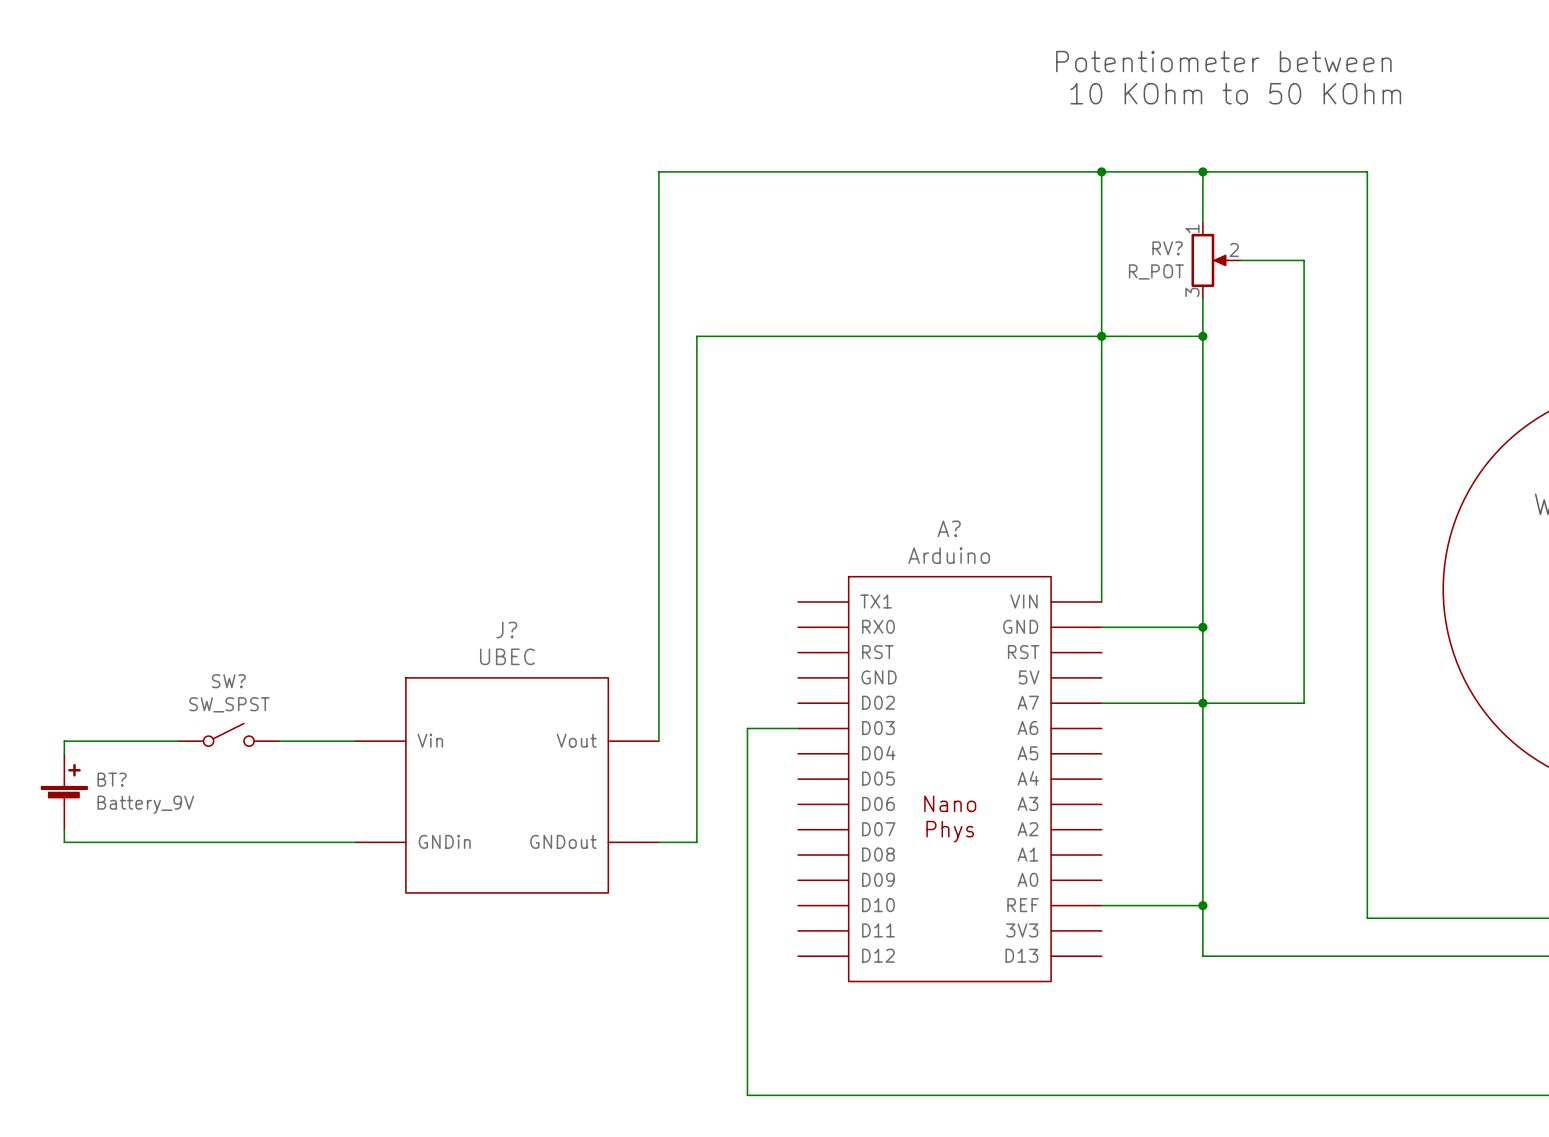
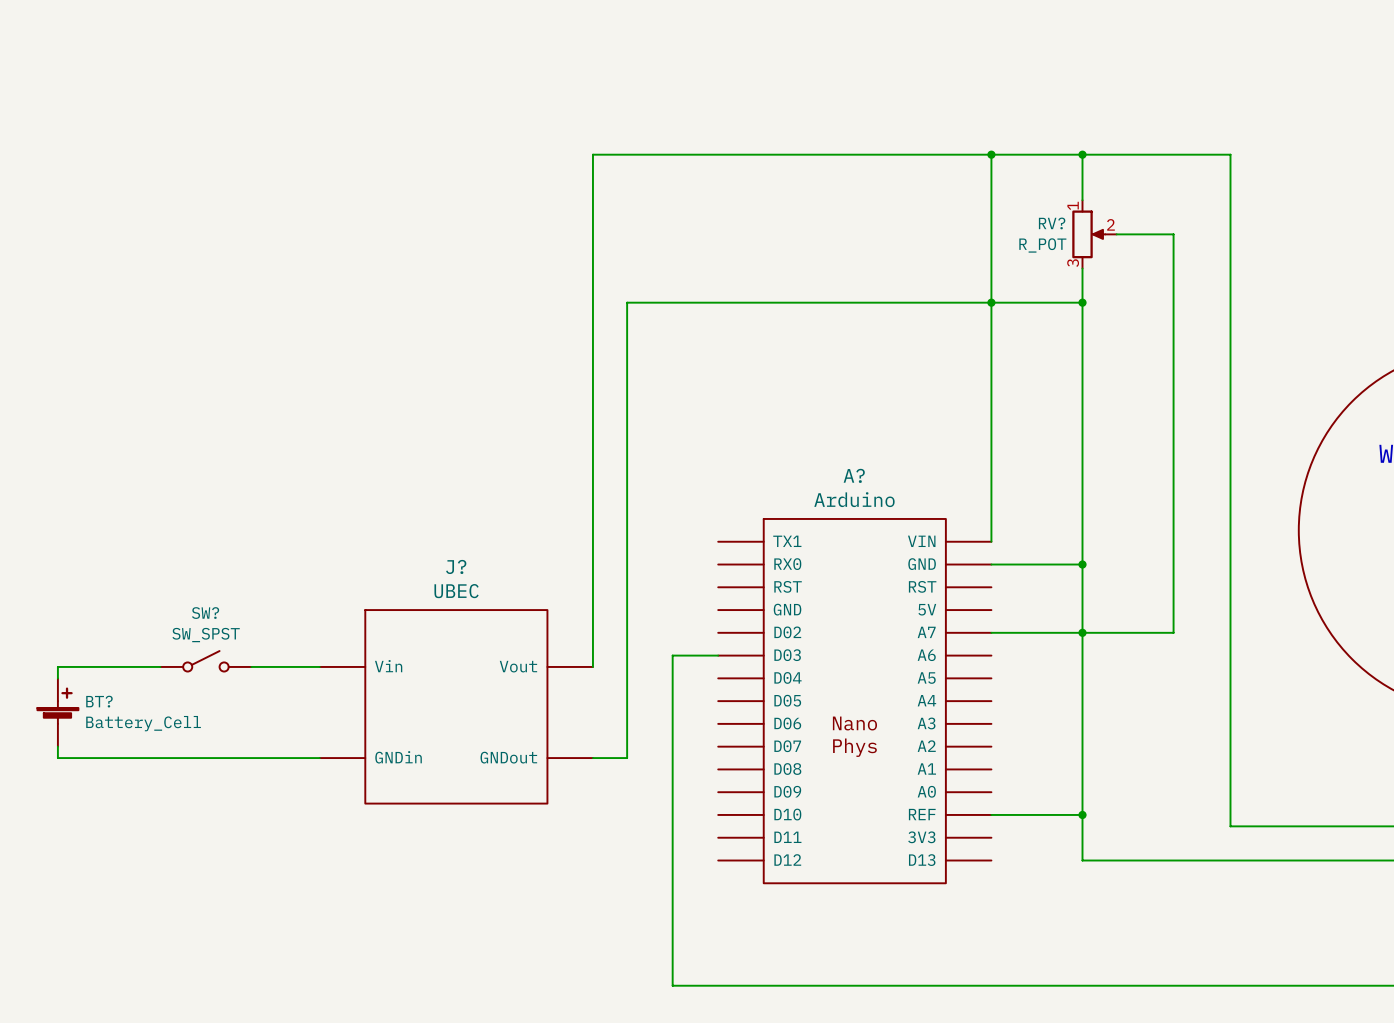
text: Potentiometer between (1223, 61) -> none
text: 10 KOhm to 50 KOhm (1235, 93) -> none
BT? value: Battery_9V (145, 804) -> Battery_Cell (143, 723)

